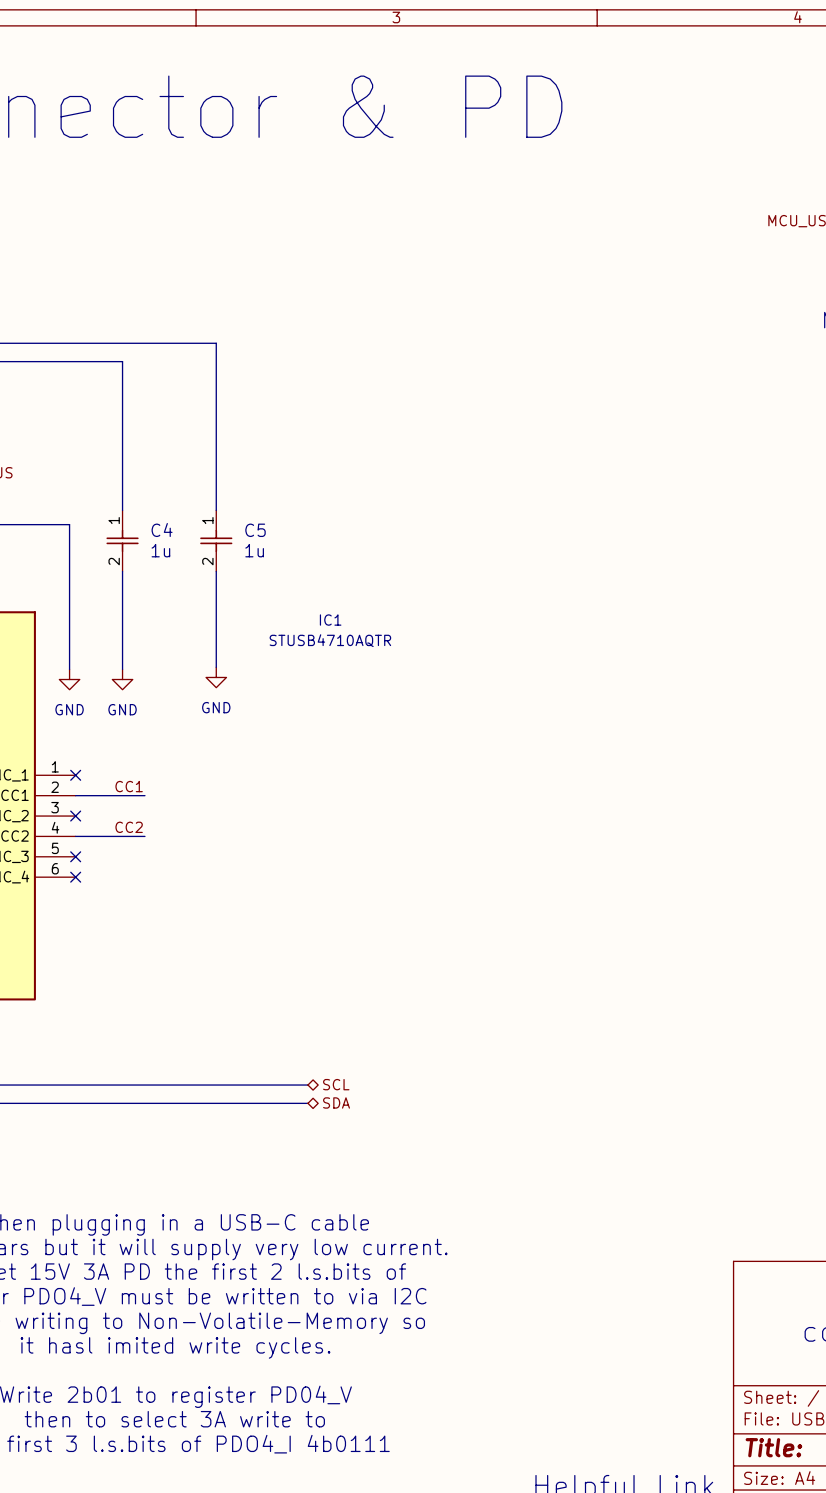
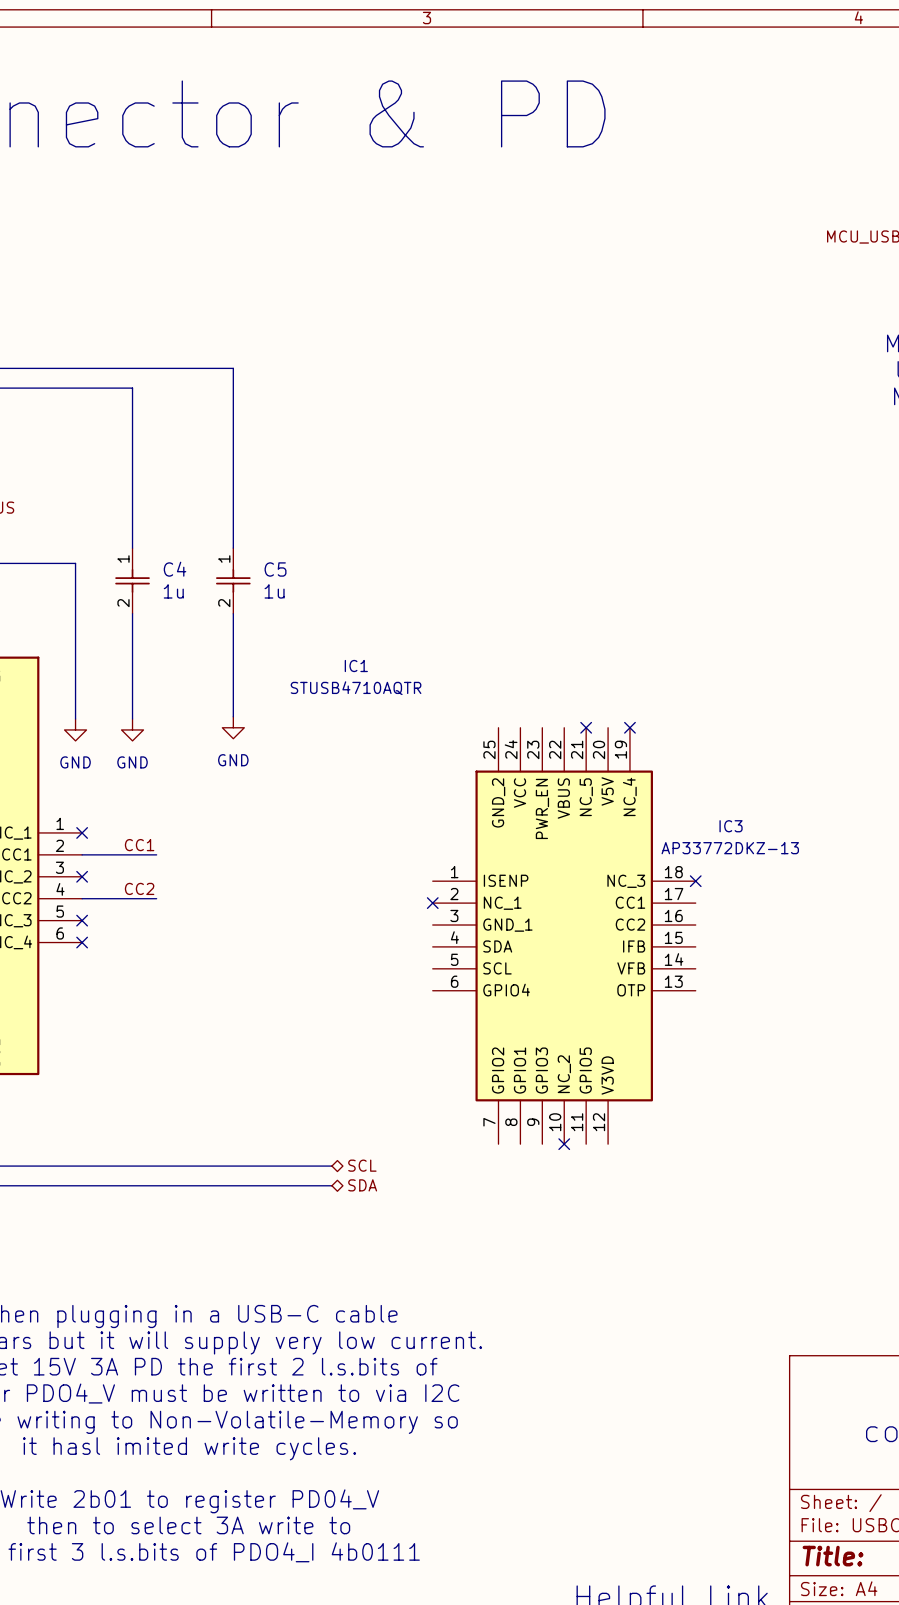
no-connect mark: none -> (586, 727)
no-connect mark: none -> (629, 727)
no-connect mark: none -> (695, 881)
no-connect mark: none -> (432, 903)
IC3: none -> AP33772DKZ-13 (564, 935)
no-connect mark: none -> (564, 1144)

